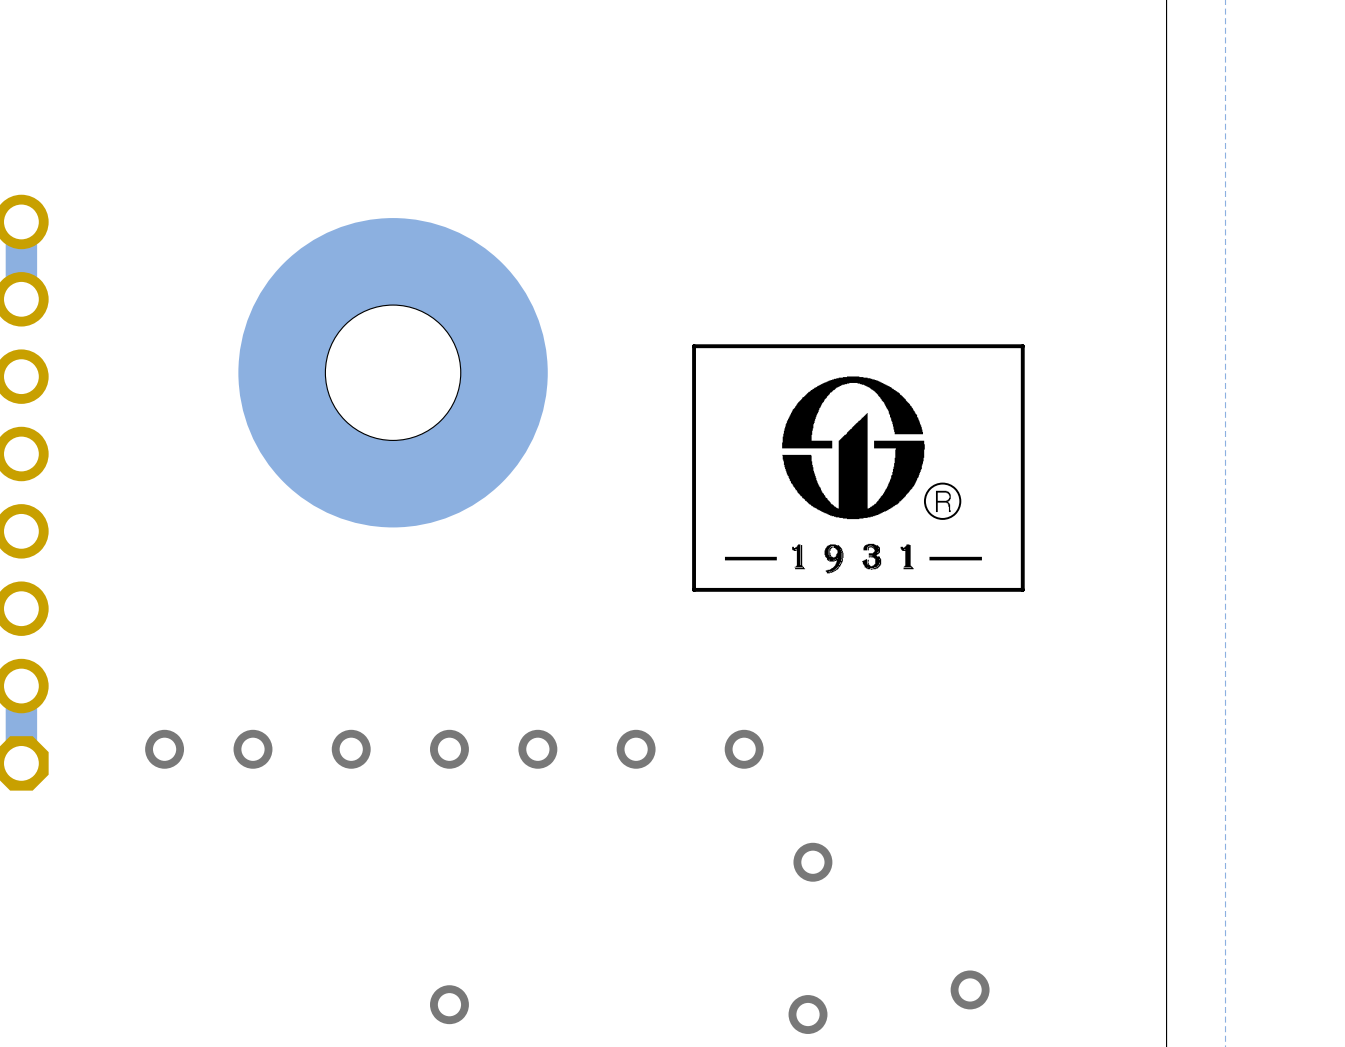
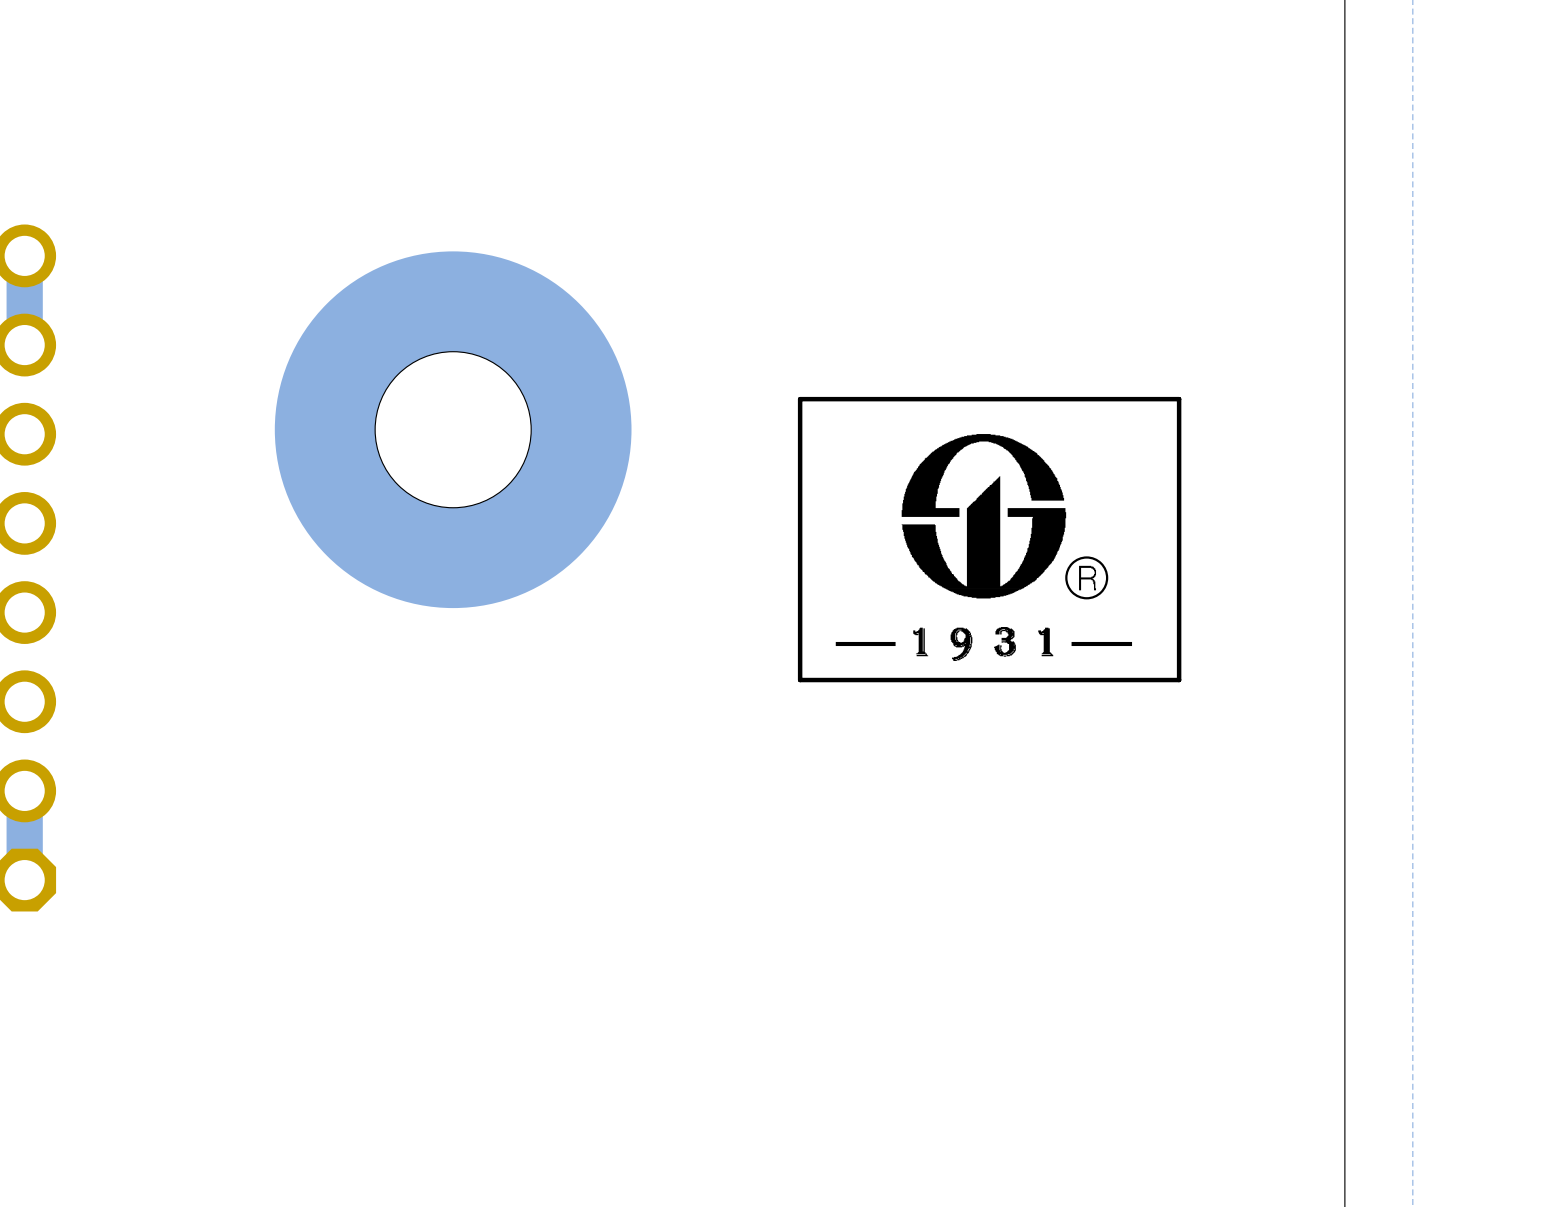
via: (164, 749) -> none
via: (252, 749) -> none
via: (351, 749) -> none
via: (449, 749) -> none
via: (537, 749) -> none
via: (636, 749) -> none
via: (744, 749) -> none
via: (812, 862) -> none
via: (970, 989) -> none
via: (449, 1004) -> none
via: (808, 1014) -> none

